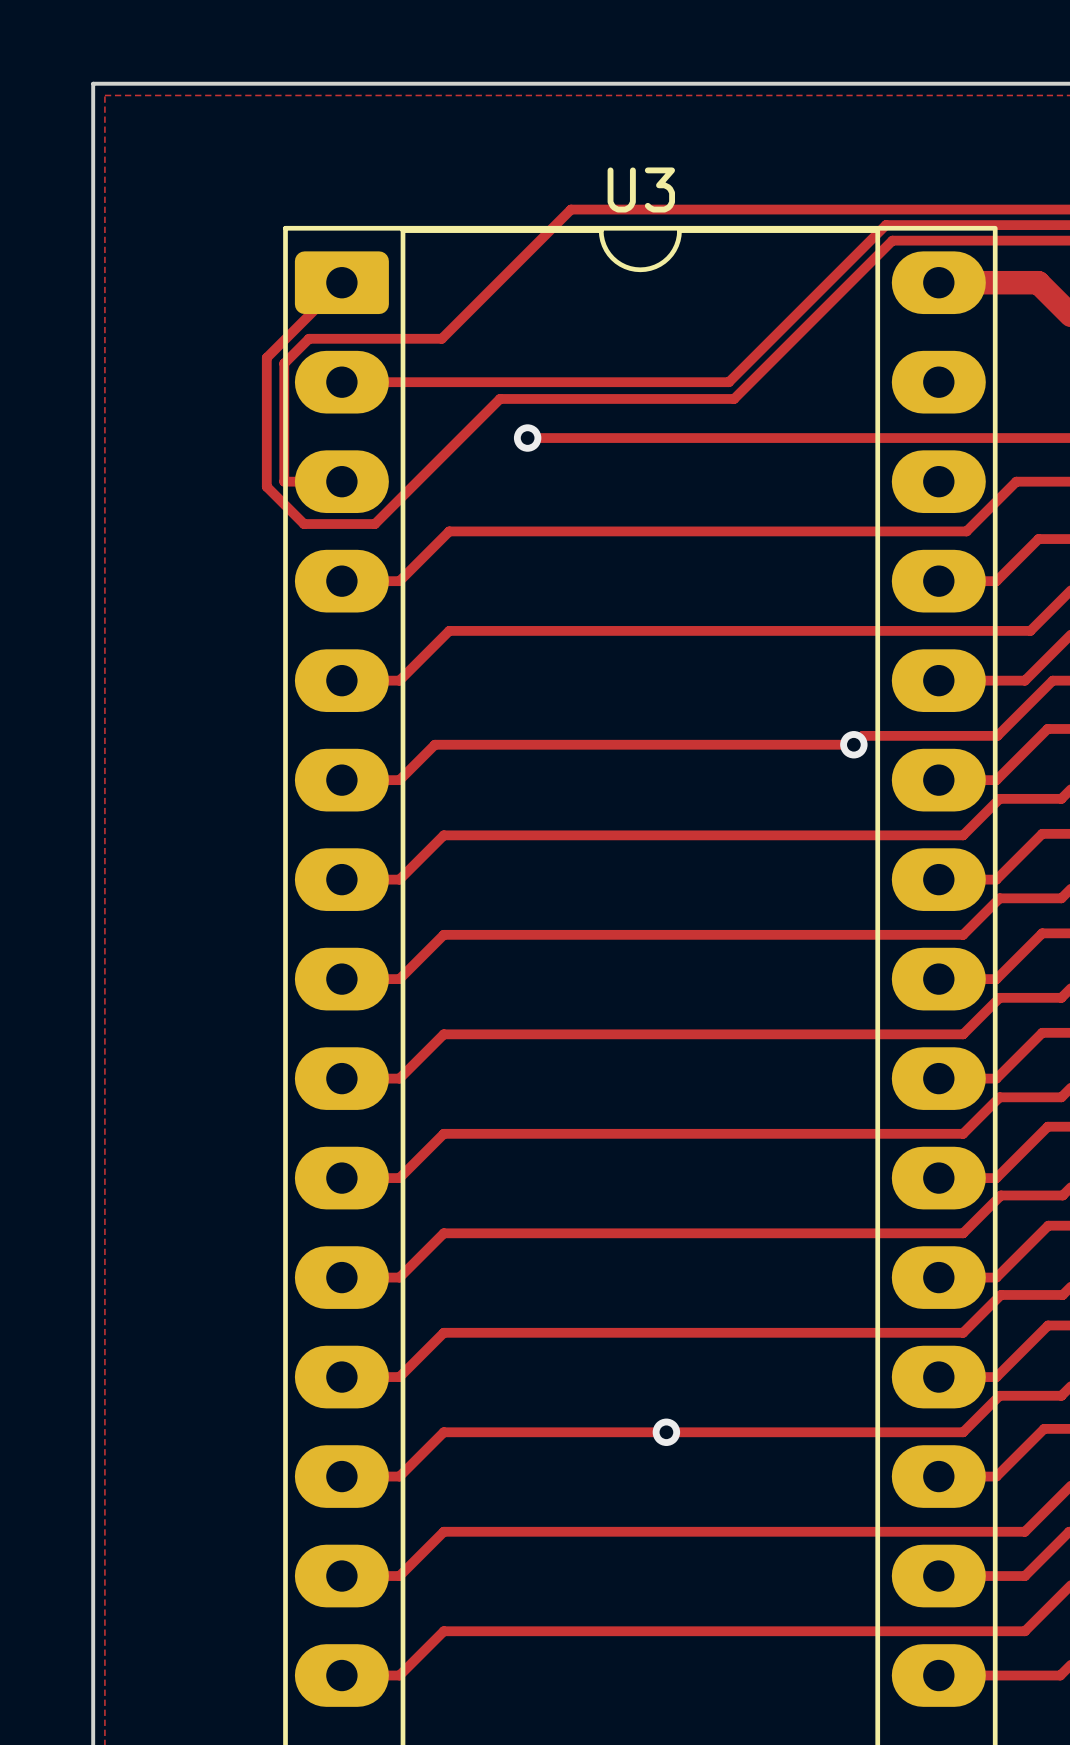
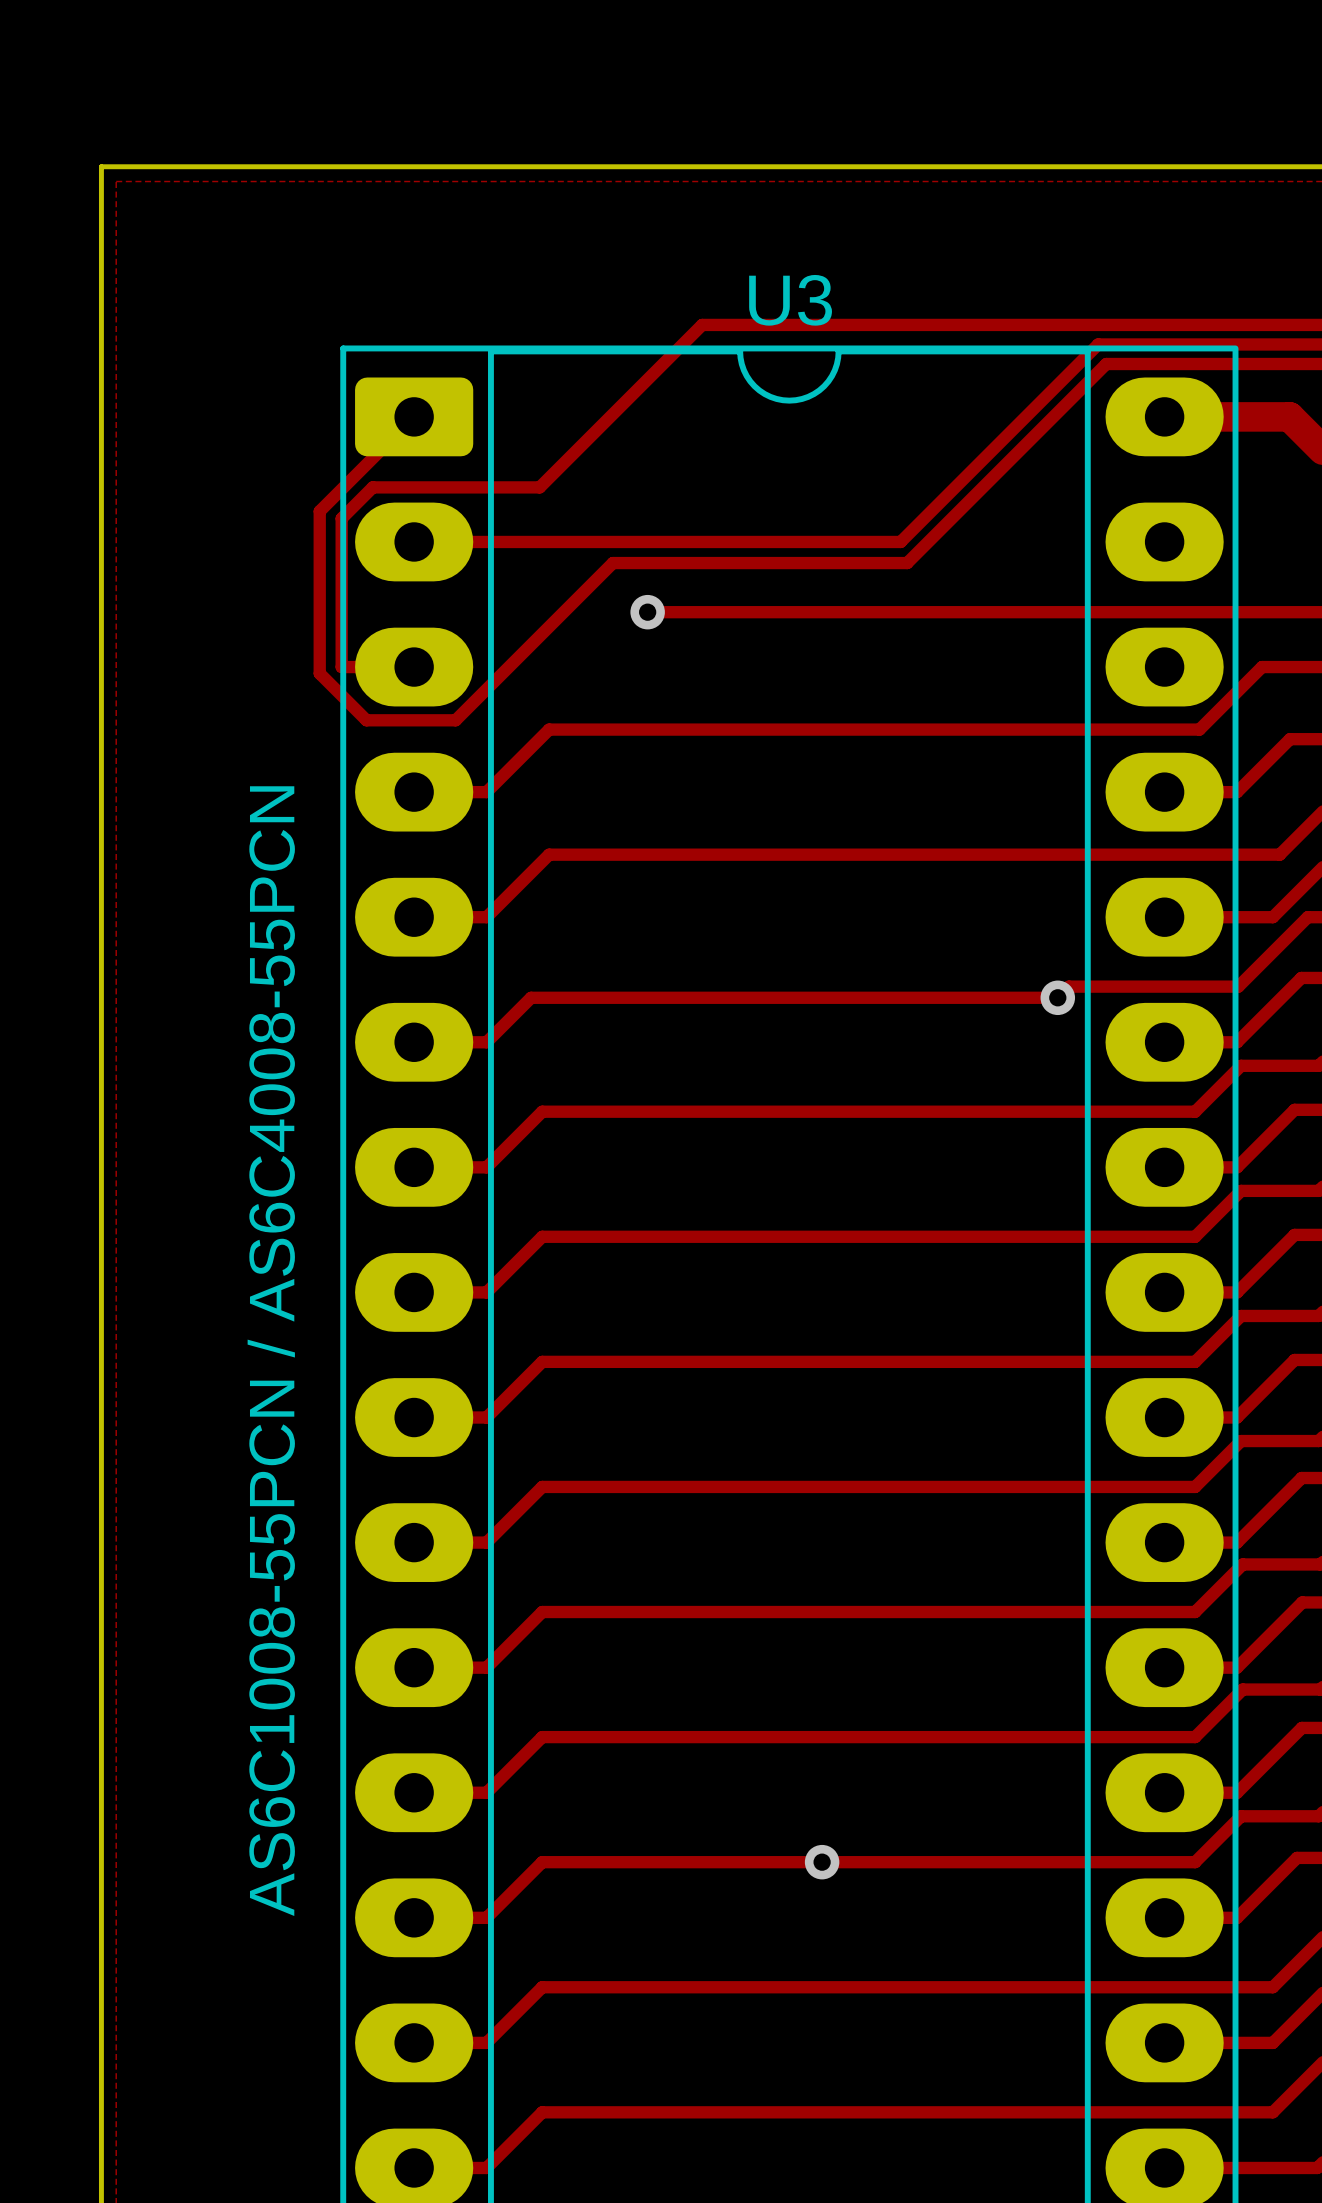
text: none -> AS6C1008-55PCN / AS6C4008-55PCN (271, 1351)

